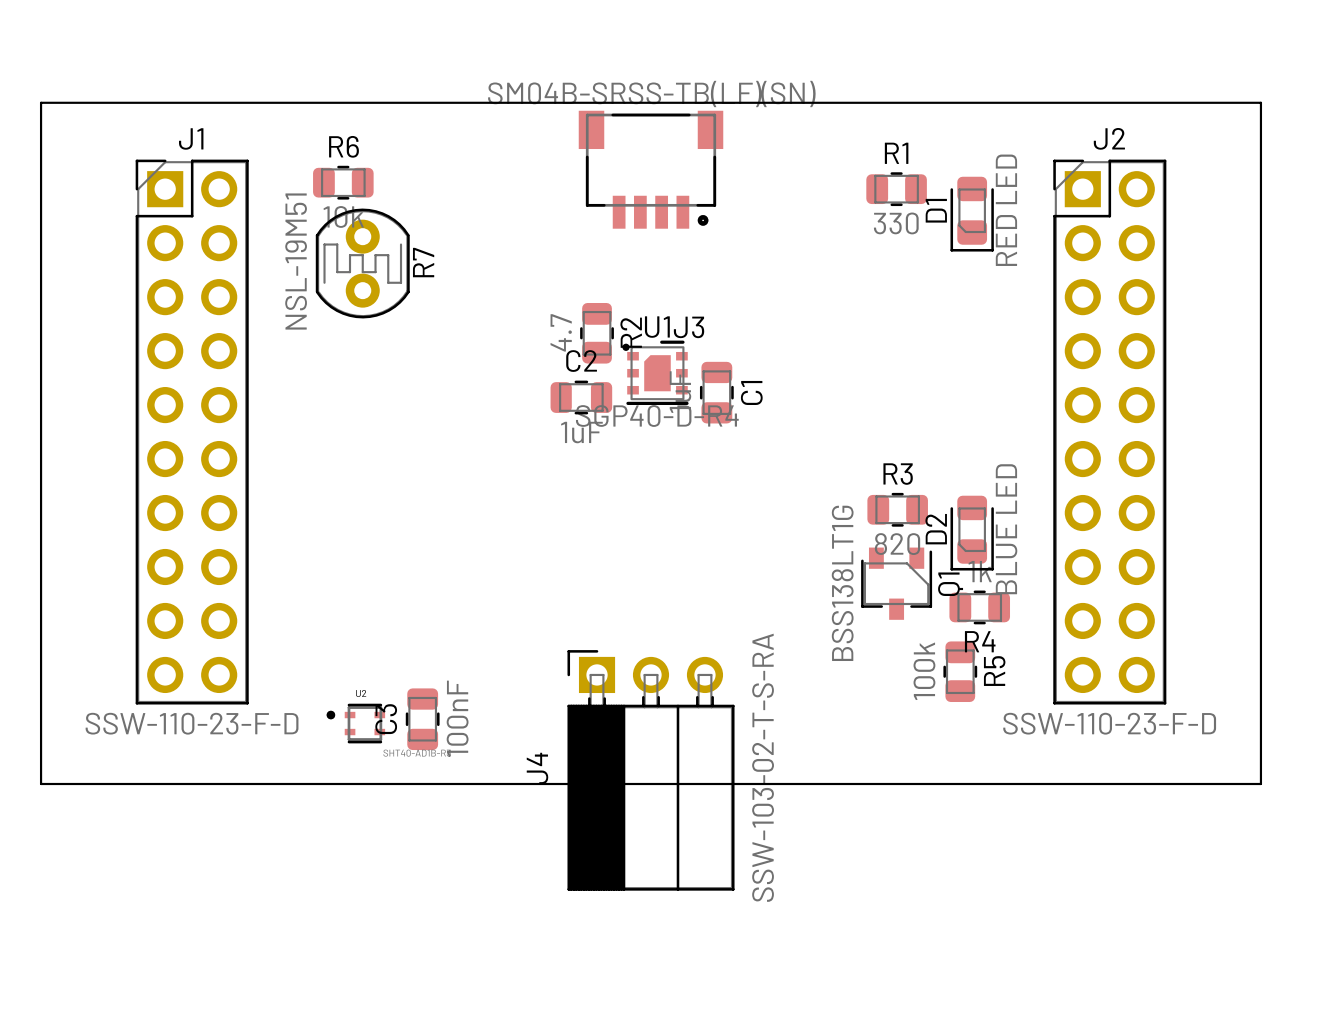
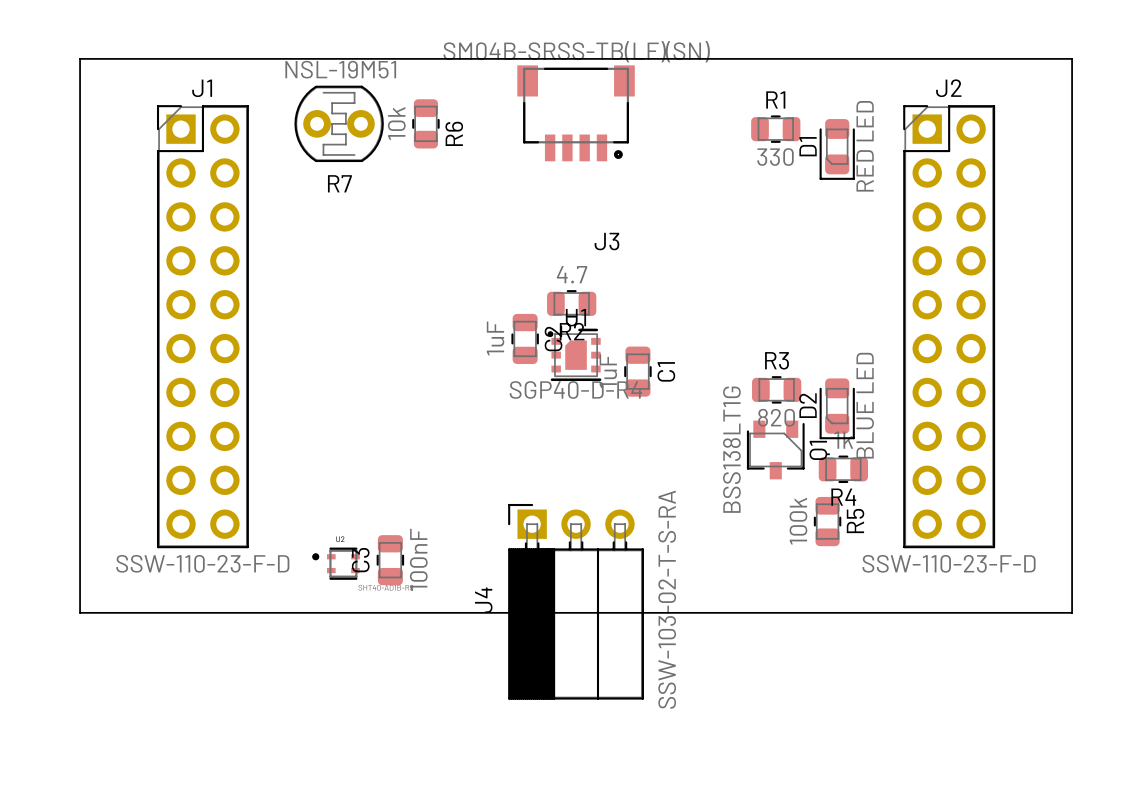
R6 rotation: 0° (343, 182) -> 90° clockwise (425, 123)
R6 position: (343, 182) -> (425, 123)
R7 rotation: 0° (362, 263) -> 90° clockwise (339, 123)
R7 position: (362, 263) -> (339, 123)
R2 rotation: 0° (597, 333) -> 90° clockwise (571, 303)
R2 position: (597, 333) -> (571, 303)
U1 position: (655, 372) -> (574, 354)
C1 position: (716, 392) -> (637, 371)
C2 rotation: 0° (581, 397) -> 90° clockwise (525, 338)
C2 position: (581, 397) -> (525, 338)

